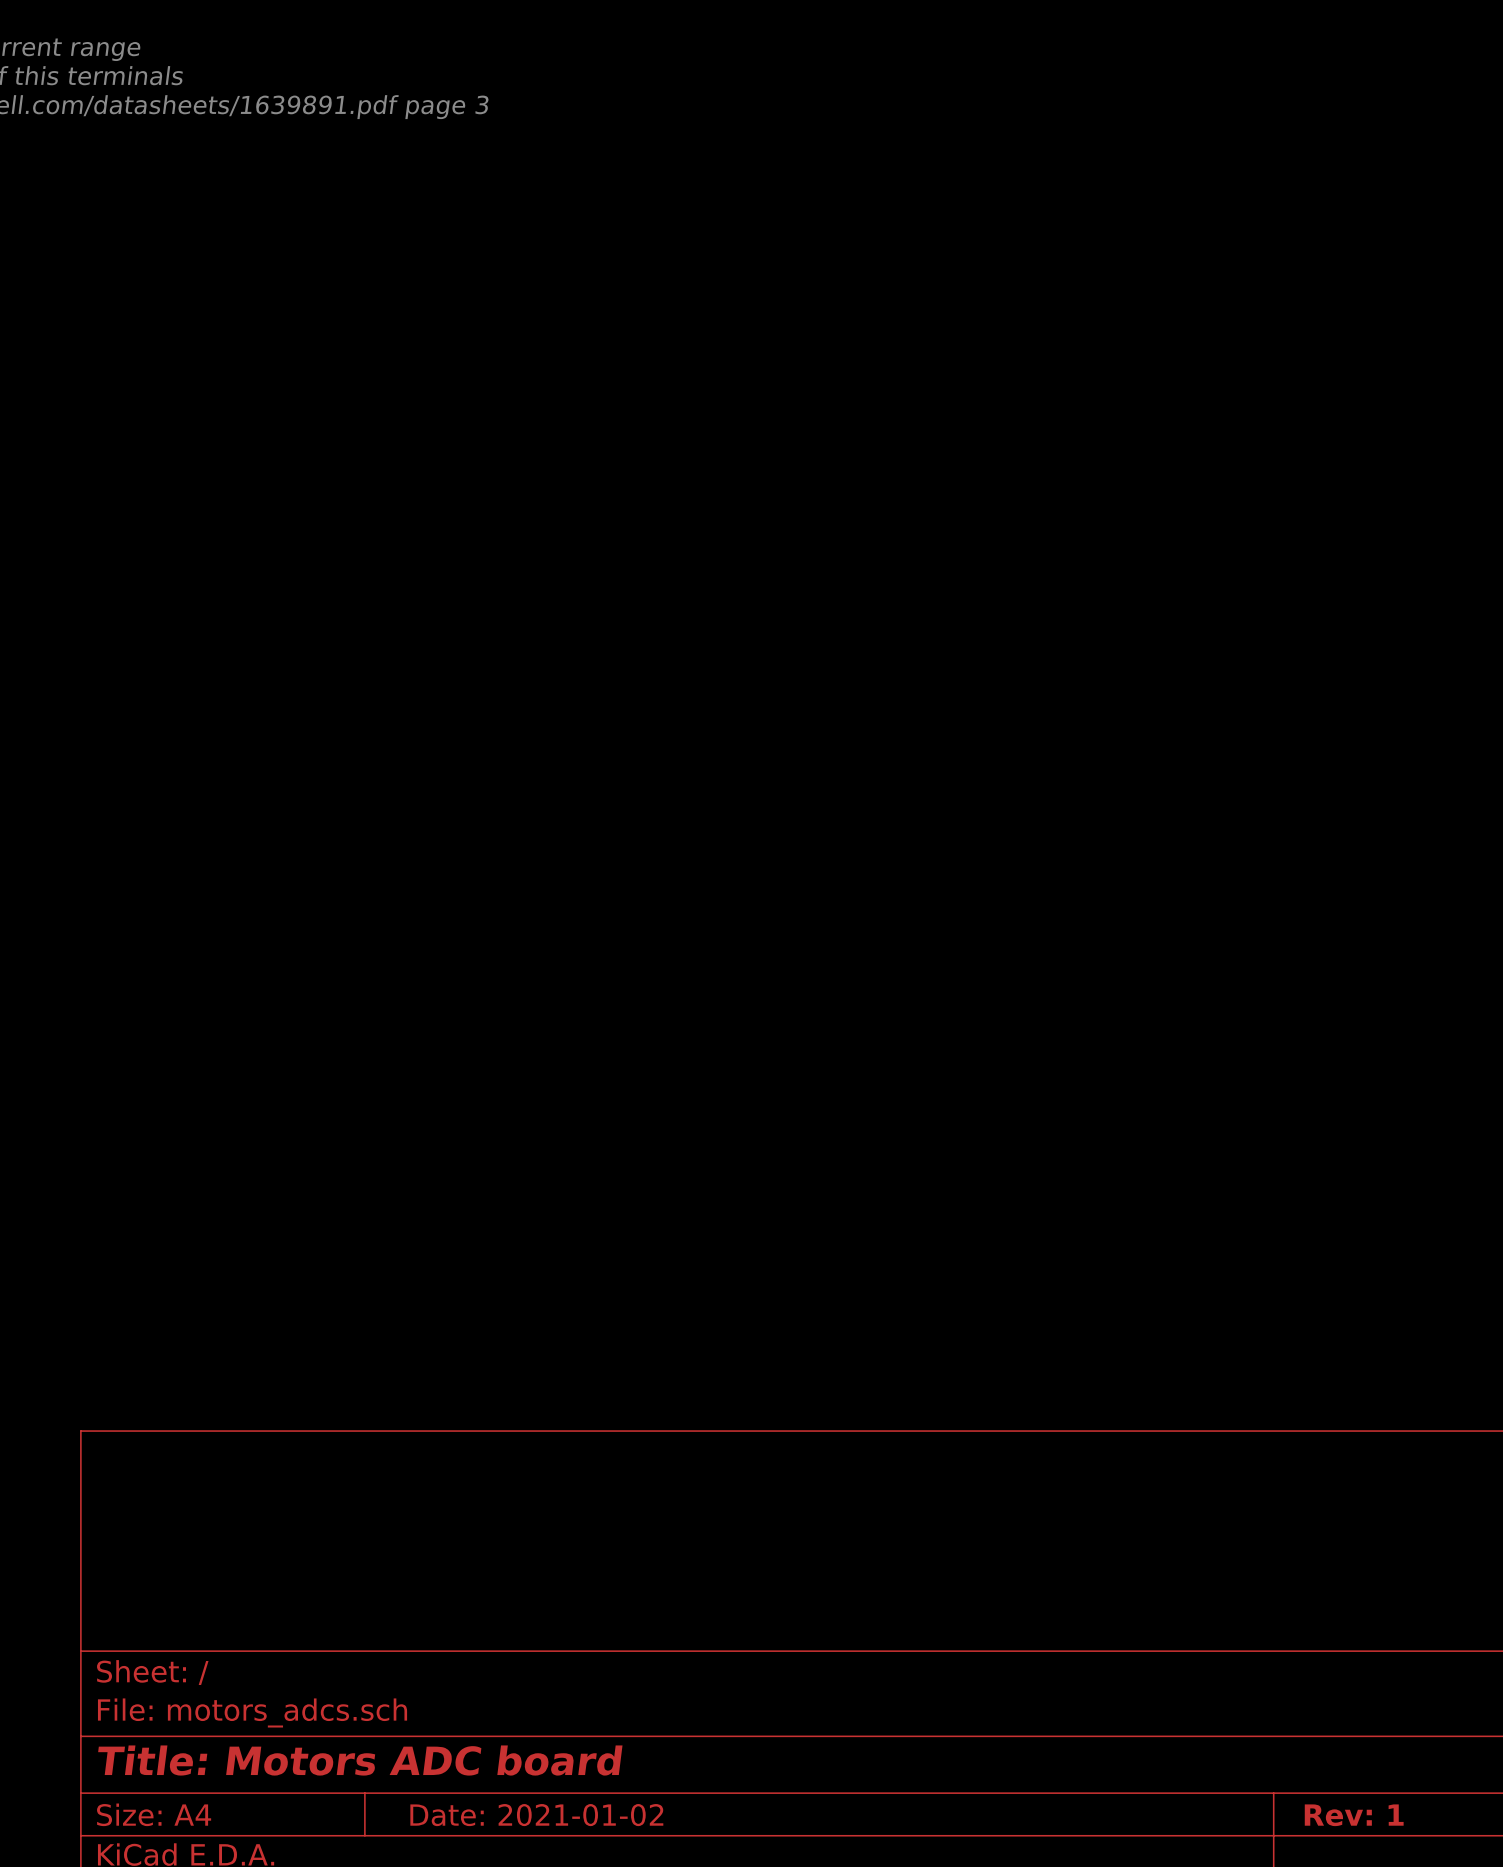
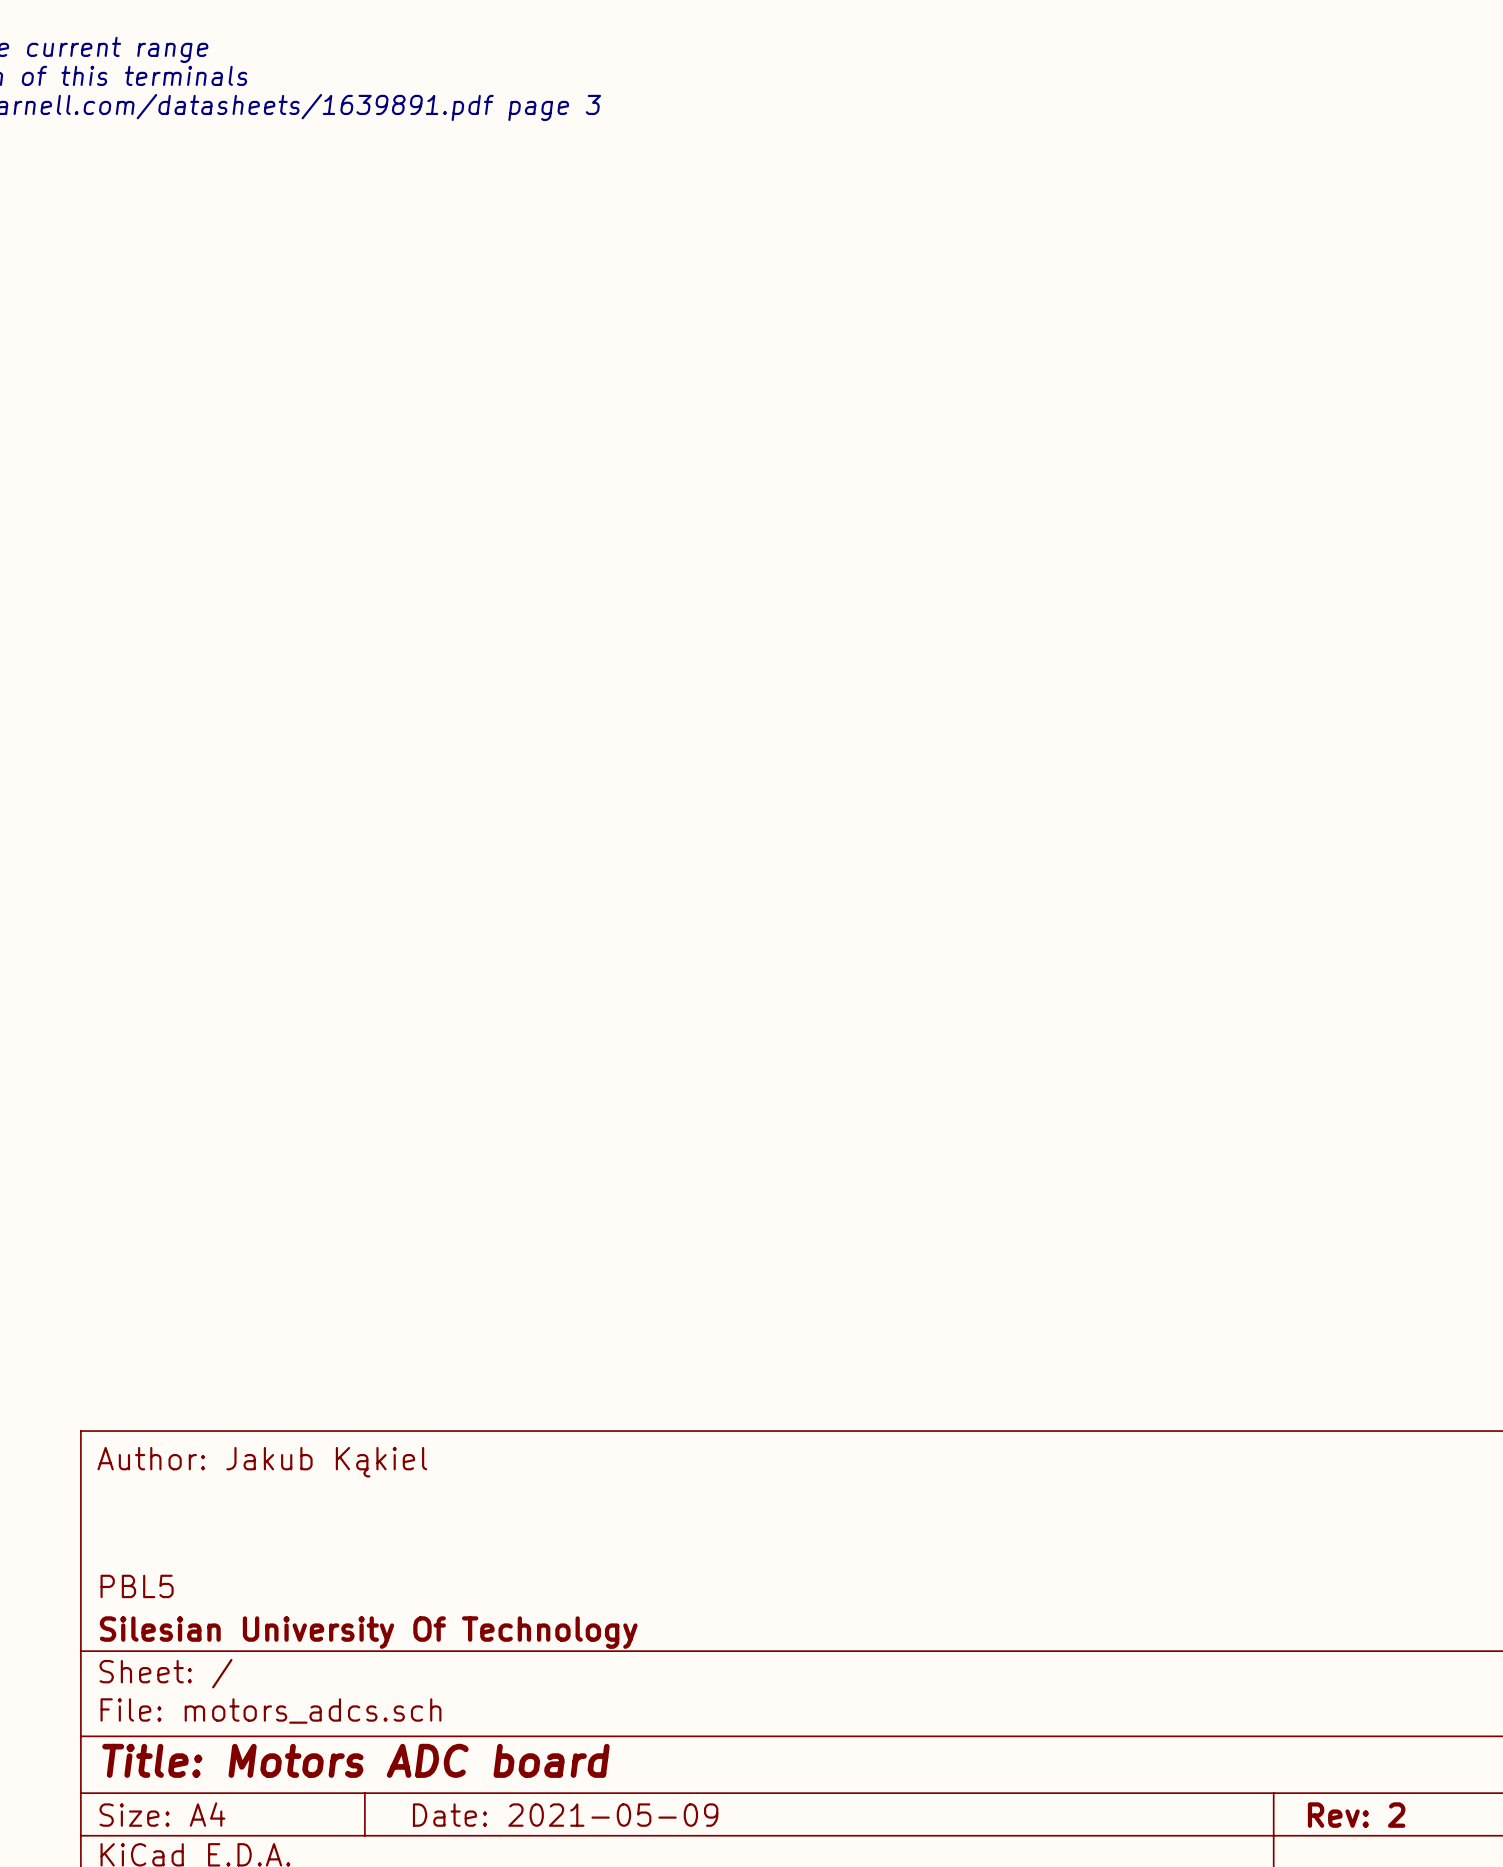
title block: none -> Author: Jakub Kąkiel (262, 1462)
title block: none -> PBL5 (137, 1586)
title block: none -> Silesian University Of Technology (368, 1632)
title block: Date: 2021-01-02 (536, 1815) -> Date: 2021-05-09 (565, 1815)
title block: Rev: 1 (1354, 1815) -> Rev: 2 (1356, 1815)

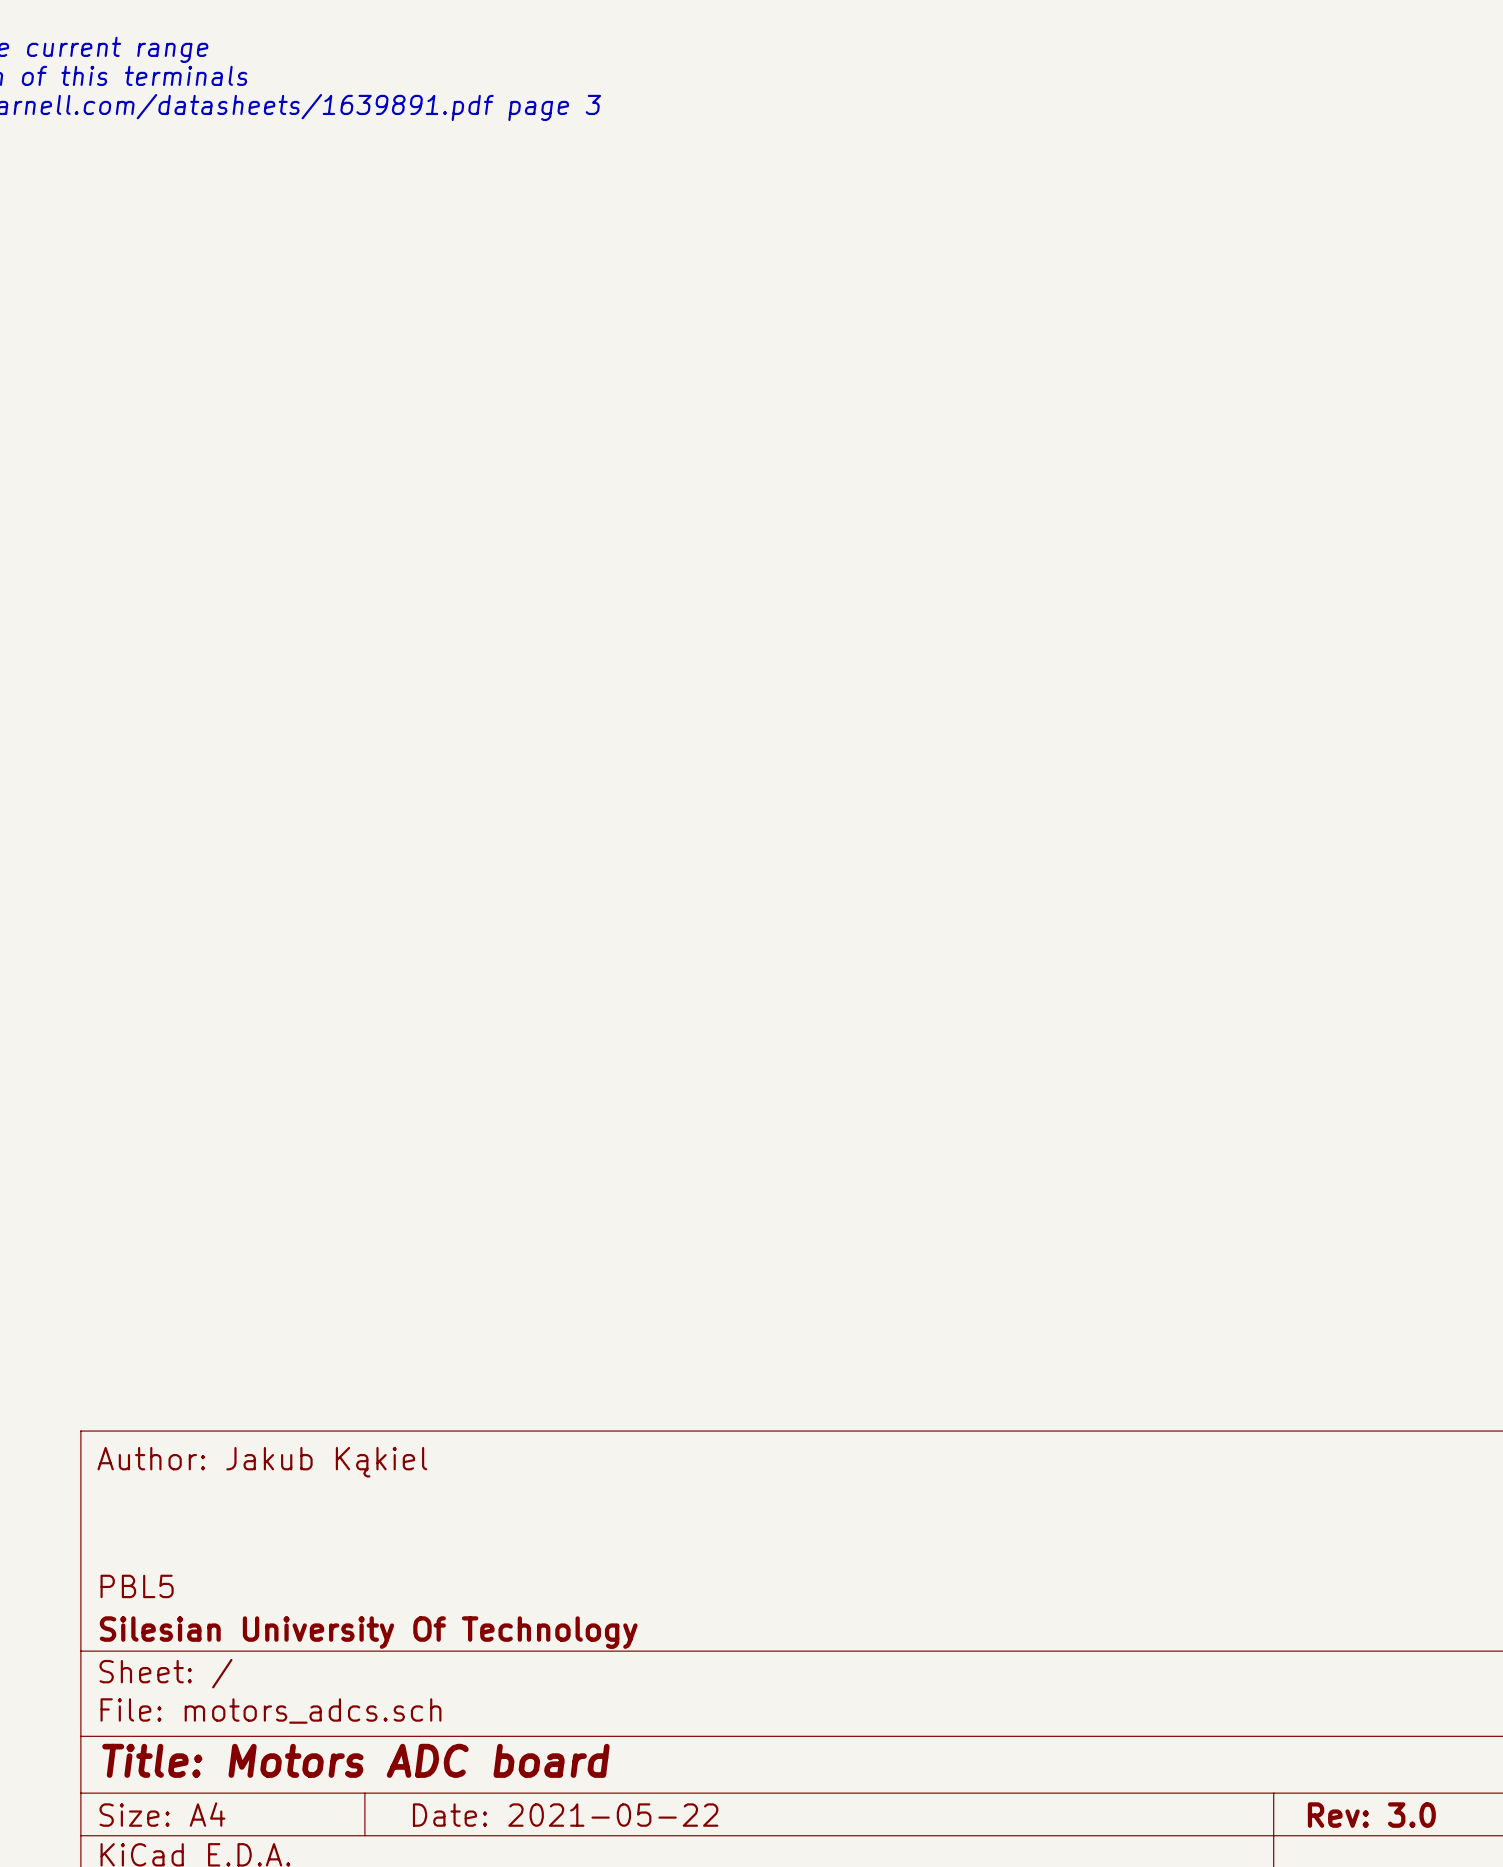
title block: Date: 2021-05-09 (565, 1815) -> Date: 2021-05-22 (565, 1815)
title block: Rev: 2 (1356, 1815) -> Rev: 3.0 (1371, 1815)

